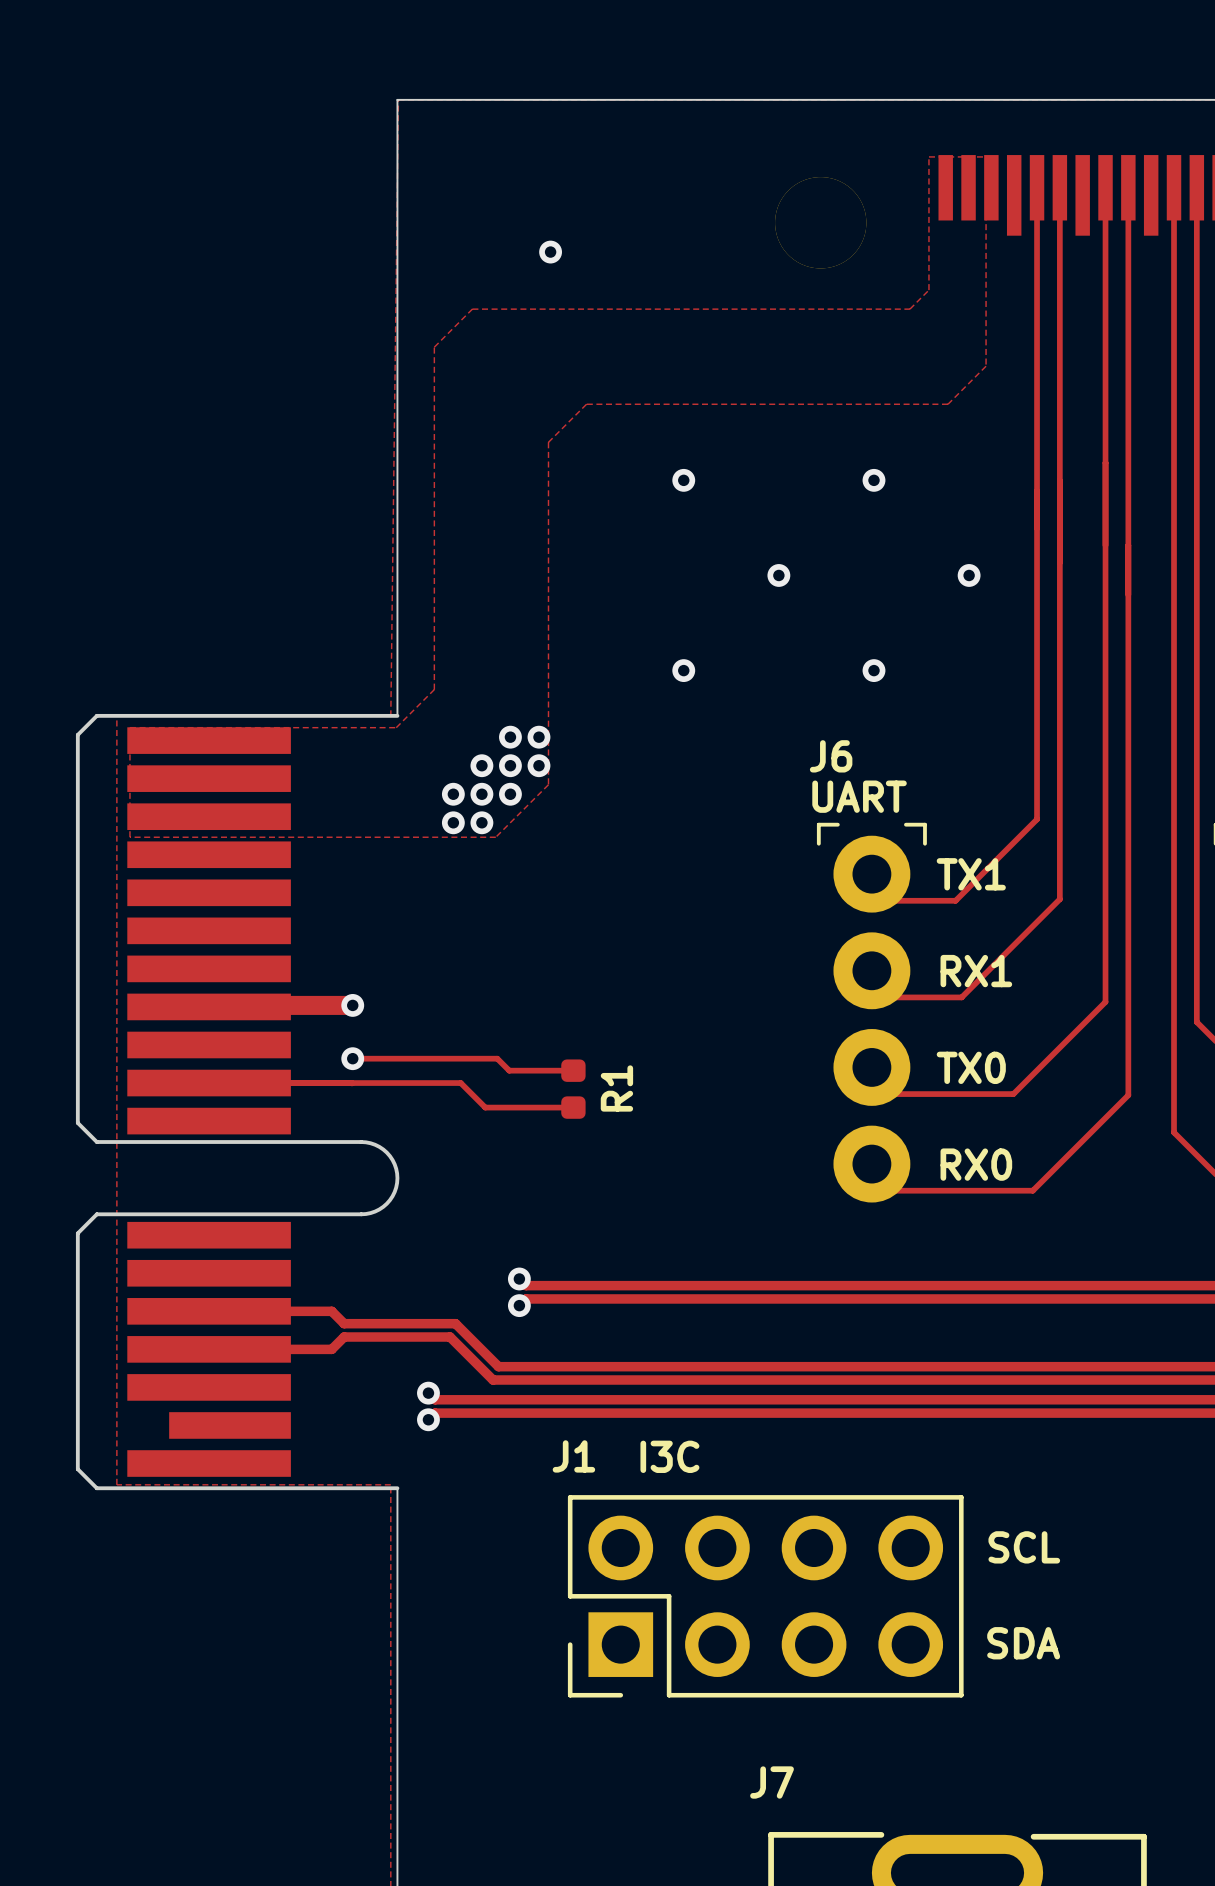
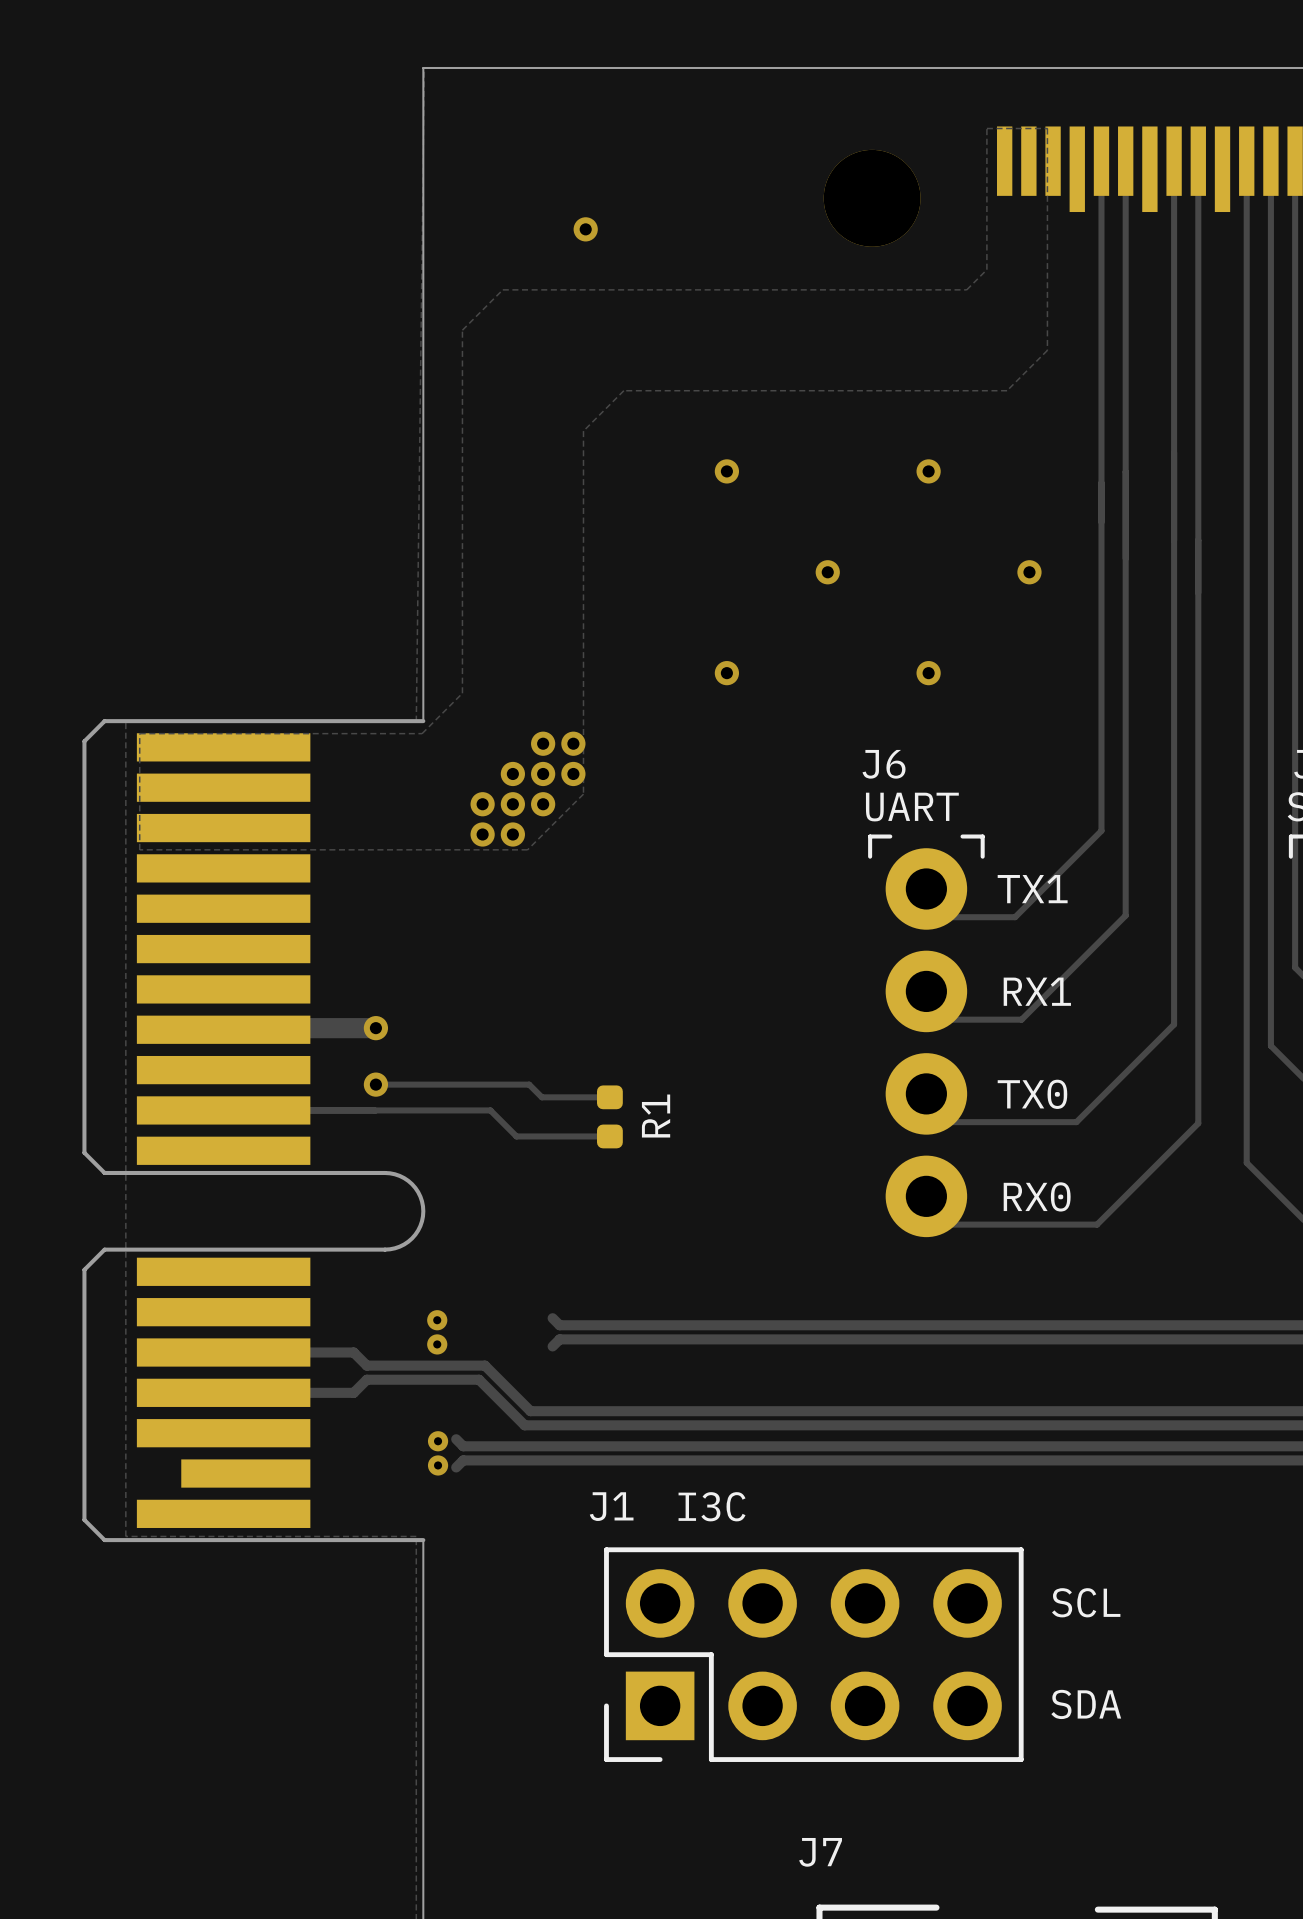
via: (519, 1278) -> none
via: none -> (437, 1320)
via: none -> (437, 1344)
via: (519, 1305) -> none
via position: (428, 1393) -> (438, 1441)
via position: (428, 1419) -> (438, 1465)

